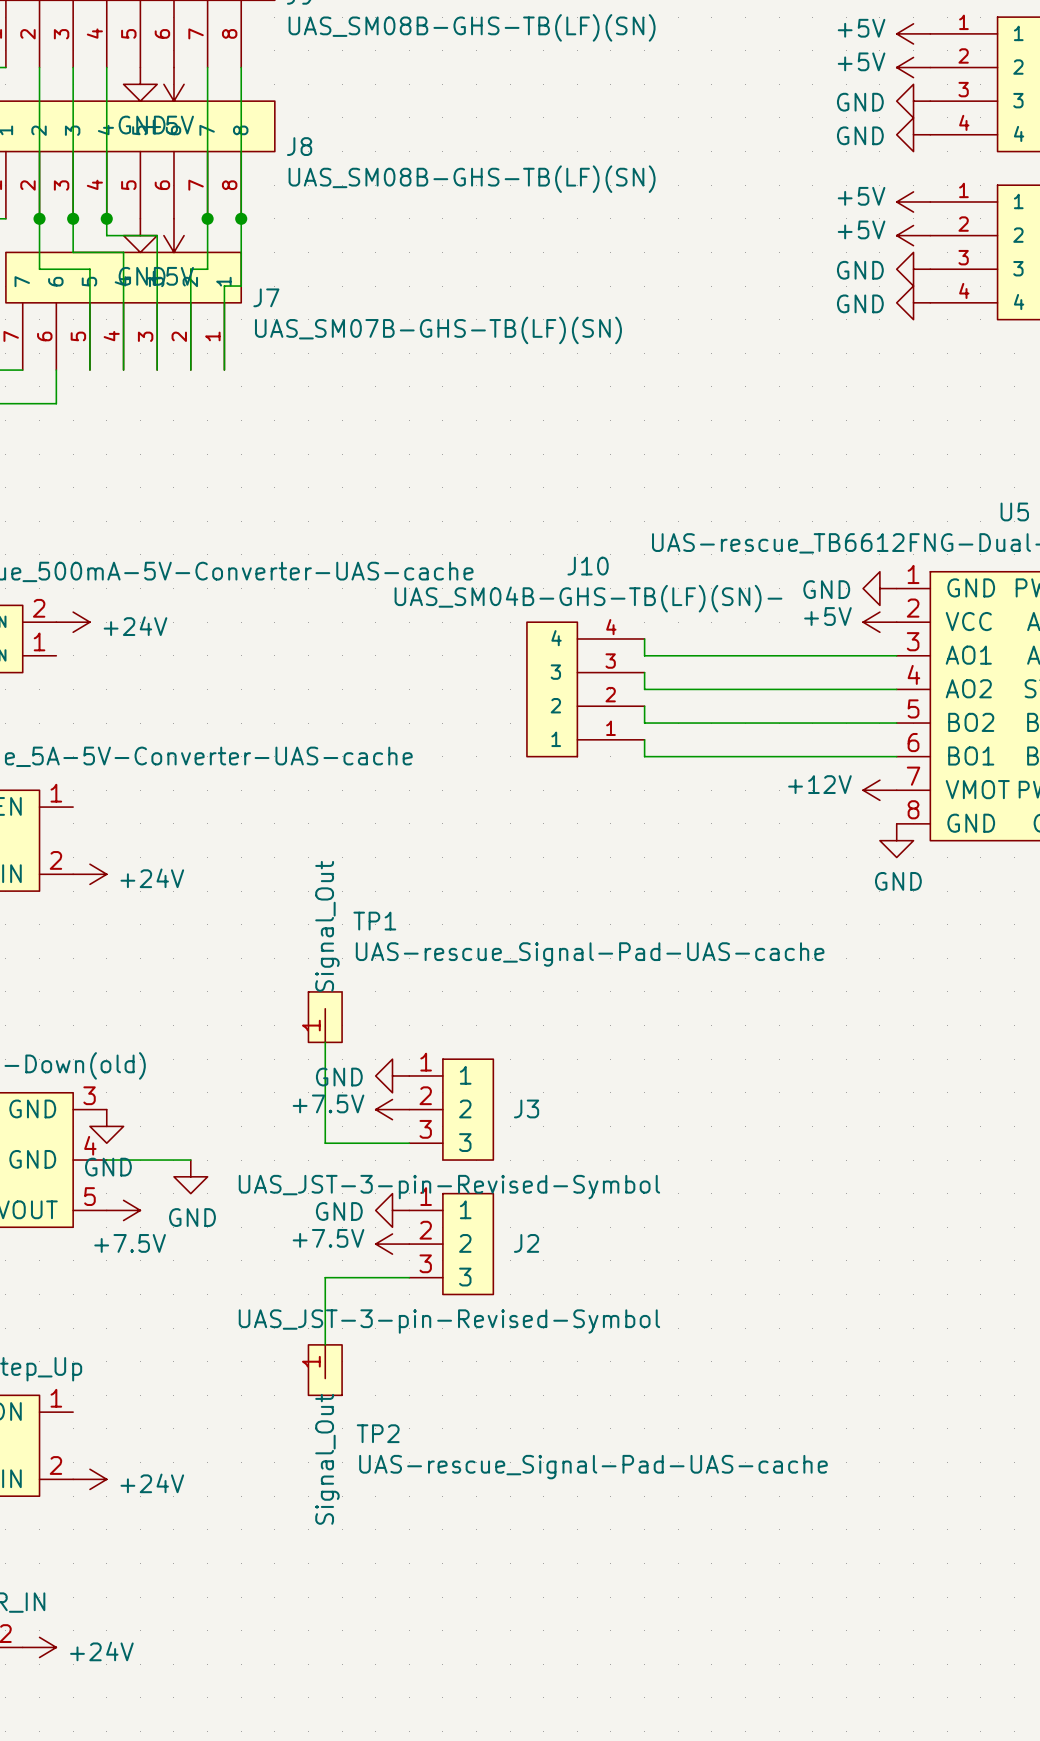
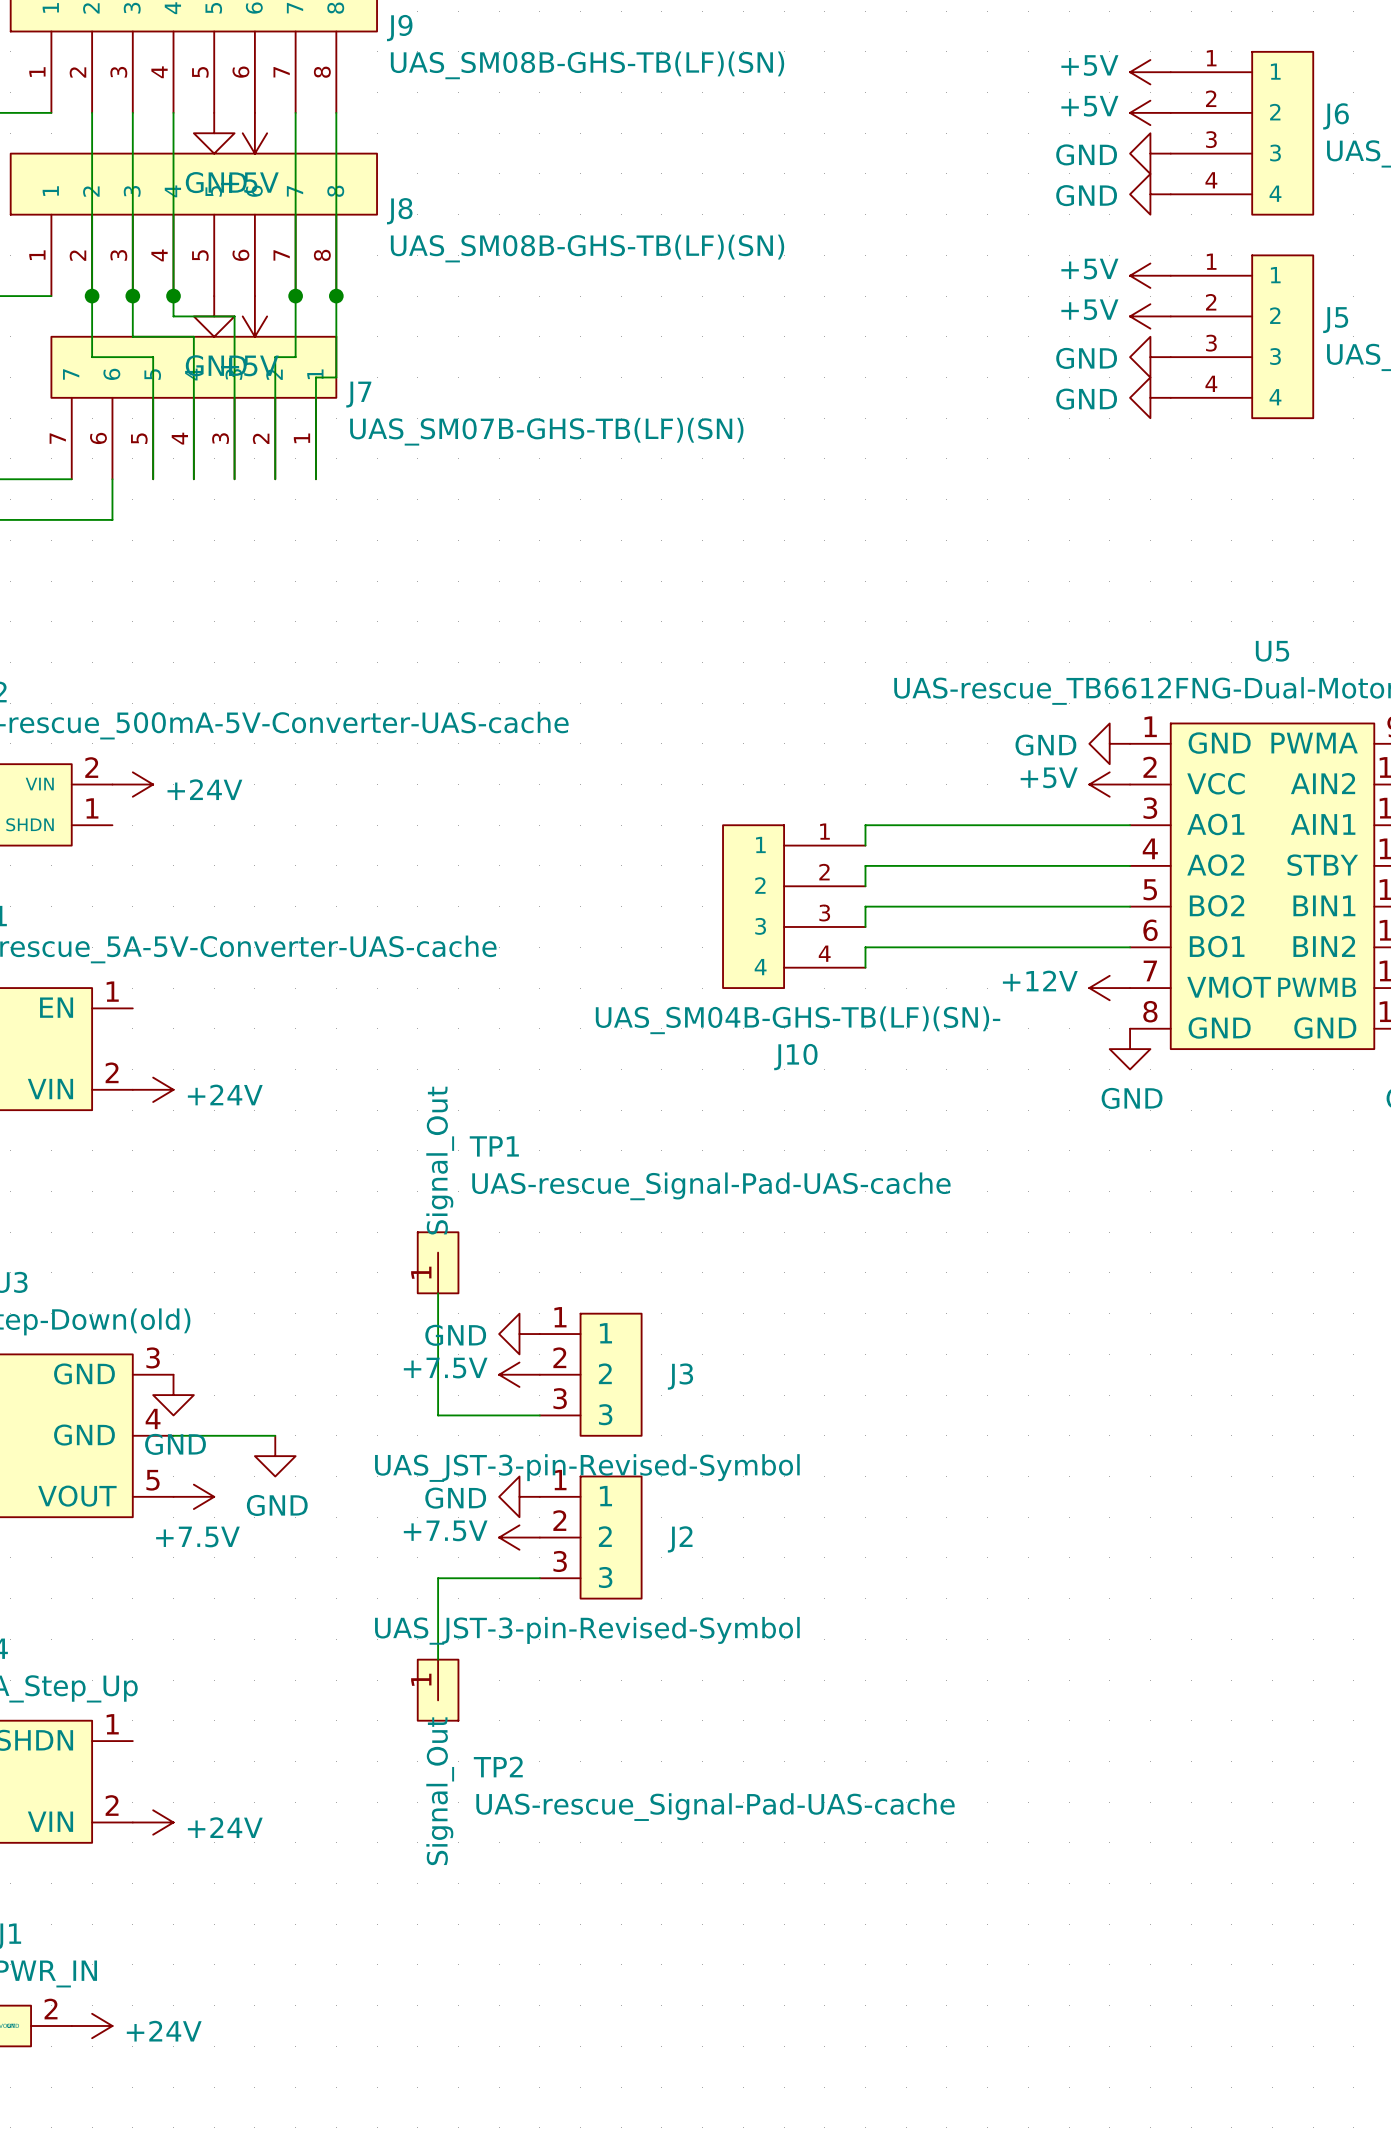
wire: (644, 638) (644, 655) (678, 655) -> (865, 845) (865, 825)
wire: (644, 672) (644, 689) (678, 689) -> (865, 886) (865, 865)
J10 flip: as is (552, 689) -> up-down (753, 906)
wire: (644, 706) (644, 723) (678, 723) -> (865, 926) (865, 906)
wire: (644, 739) (644, 756) (678, 756) -> (865, 967) (865, 947)

